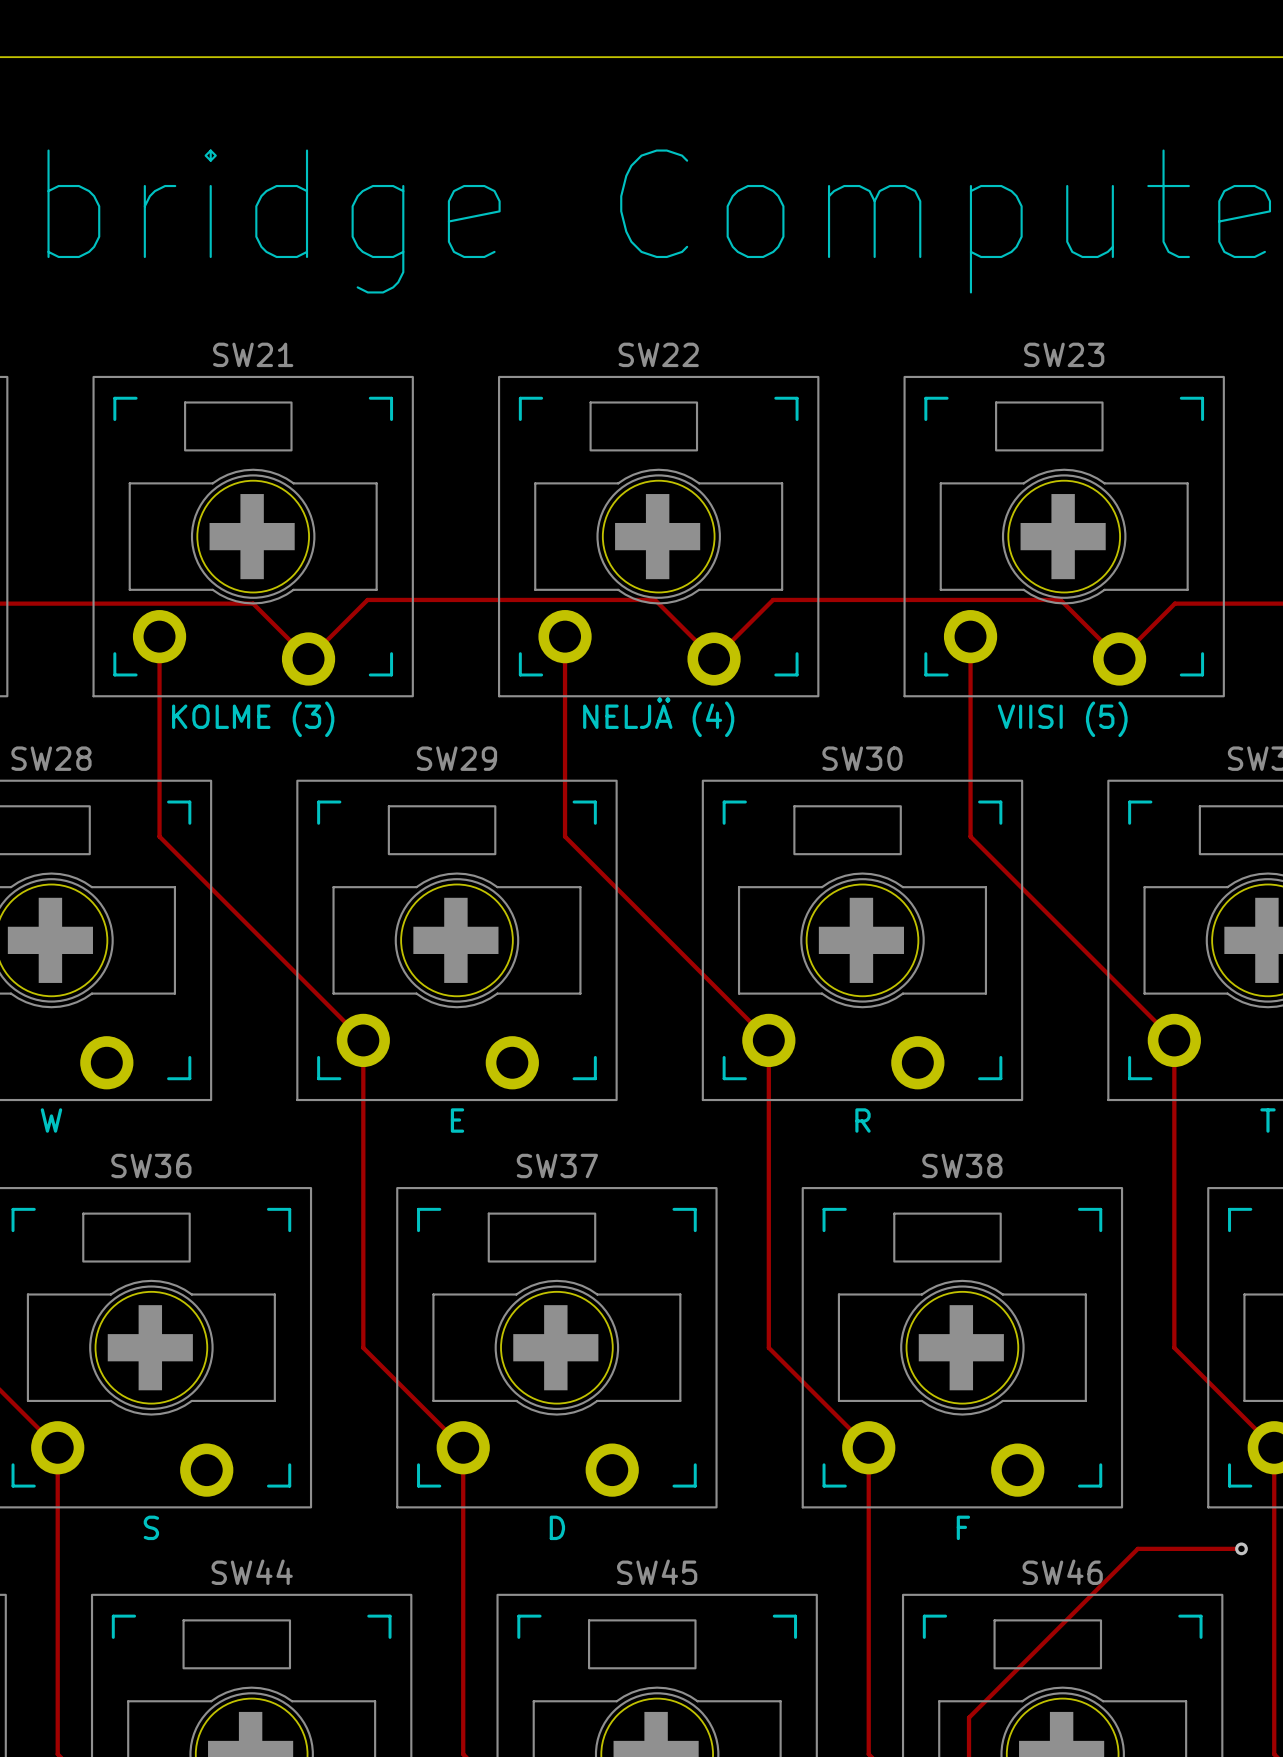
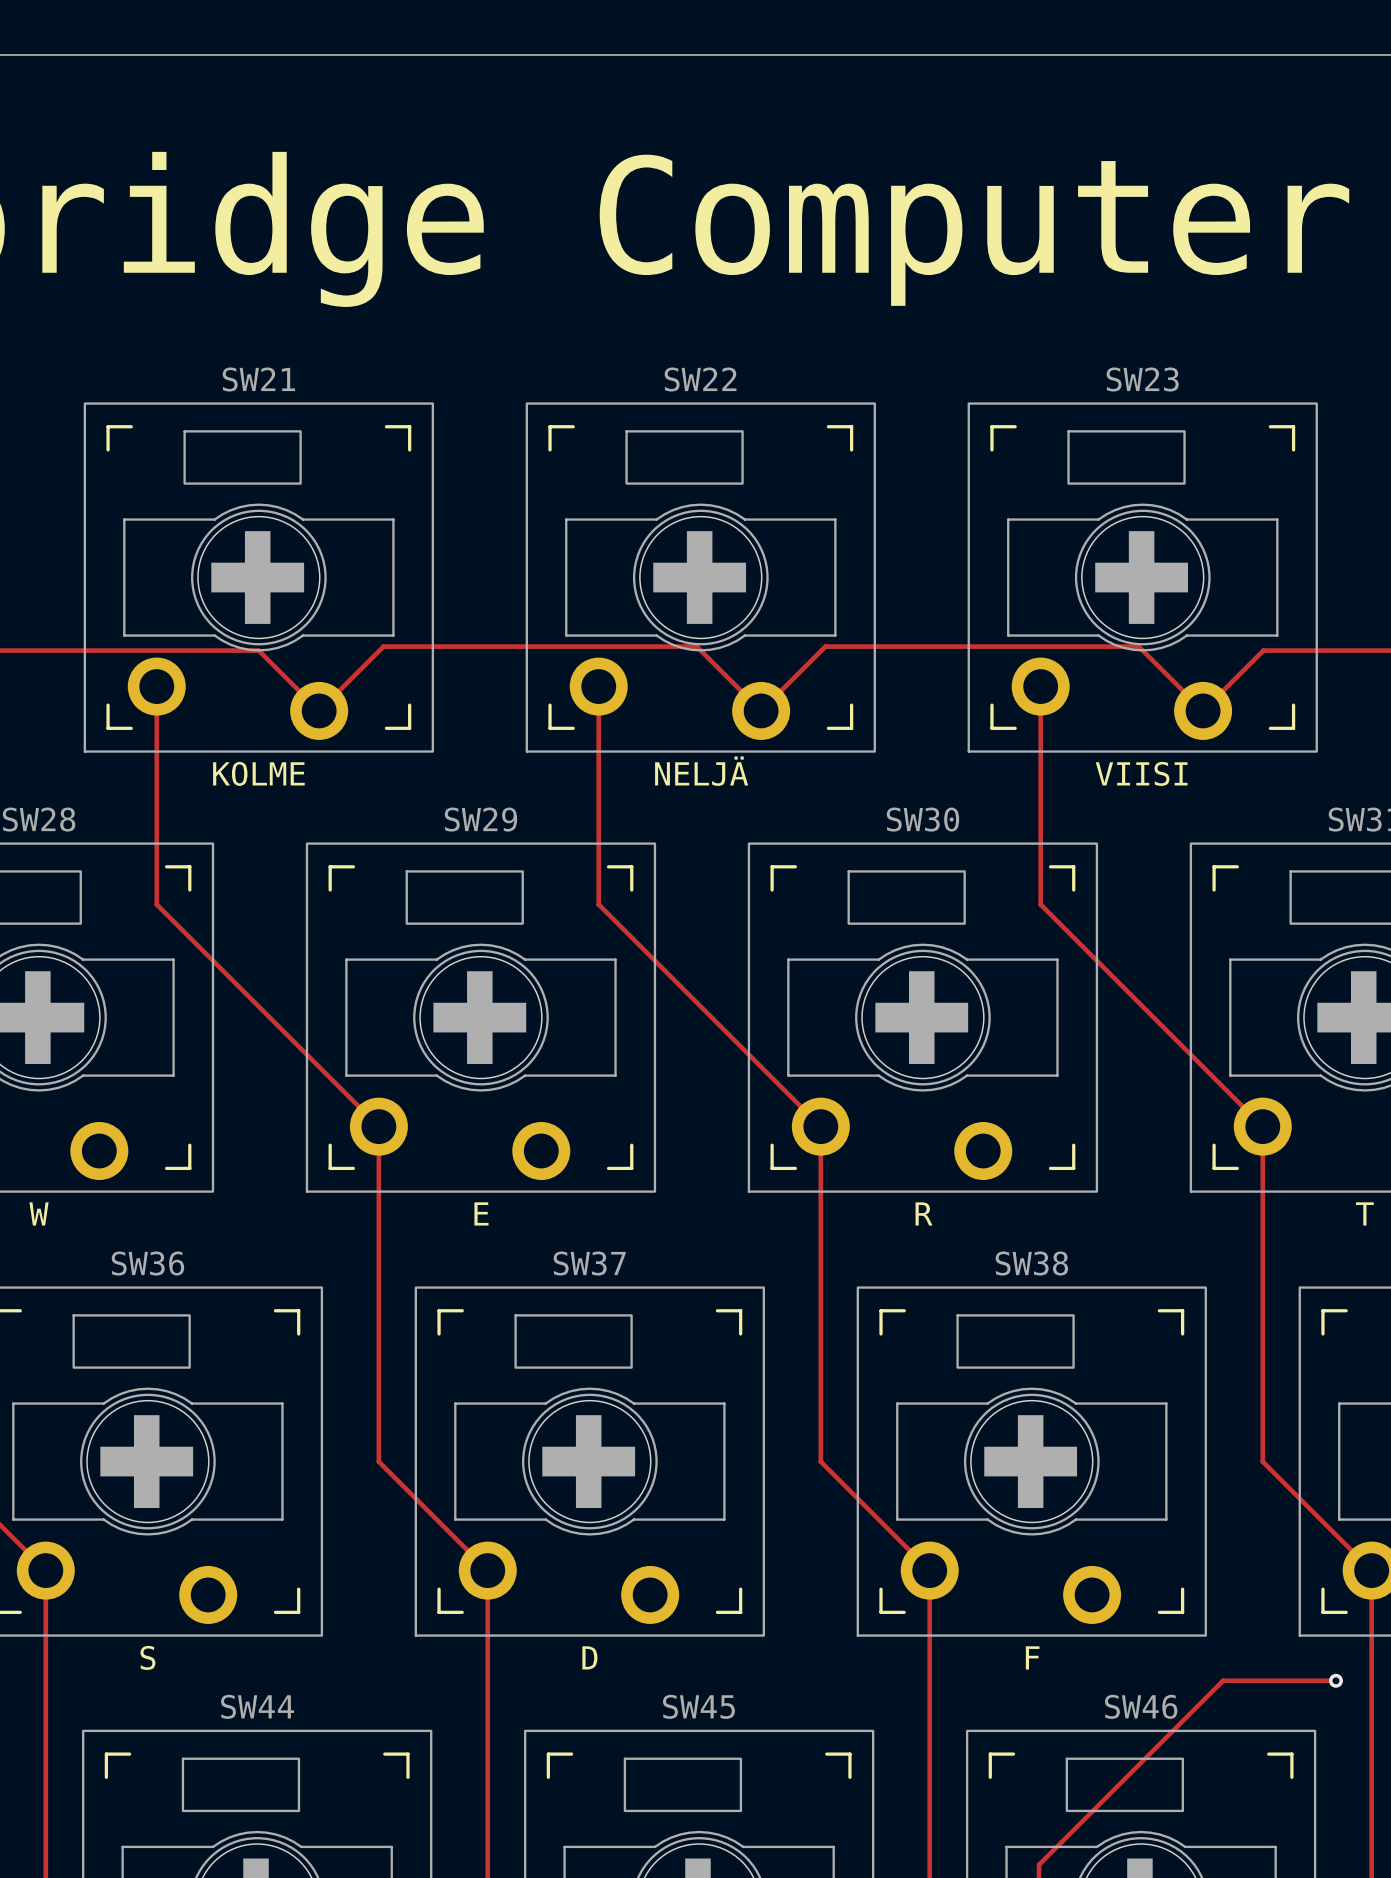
SW22 value: NELJÄ (4) (658, 717) -> NELJÄ (701, 771)
SW21 value: KOLME (3) (253, 719) -> KOLME (258, 773)
SW23 value: VIISI (5) (1062, 719) -> VIISI (1141, 773)

